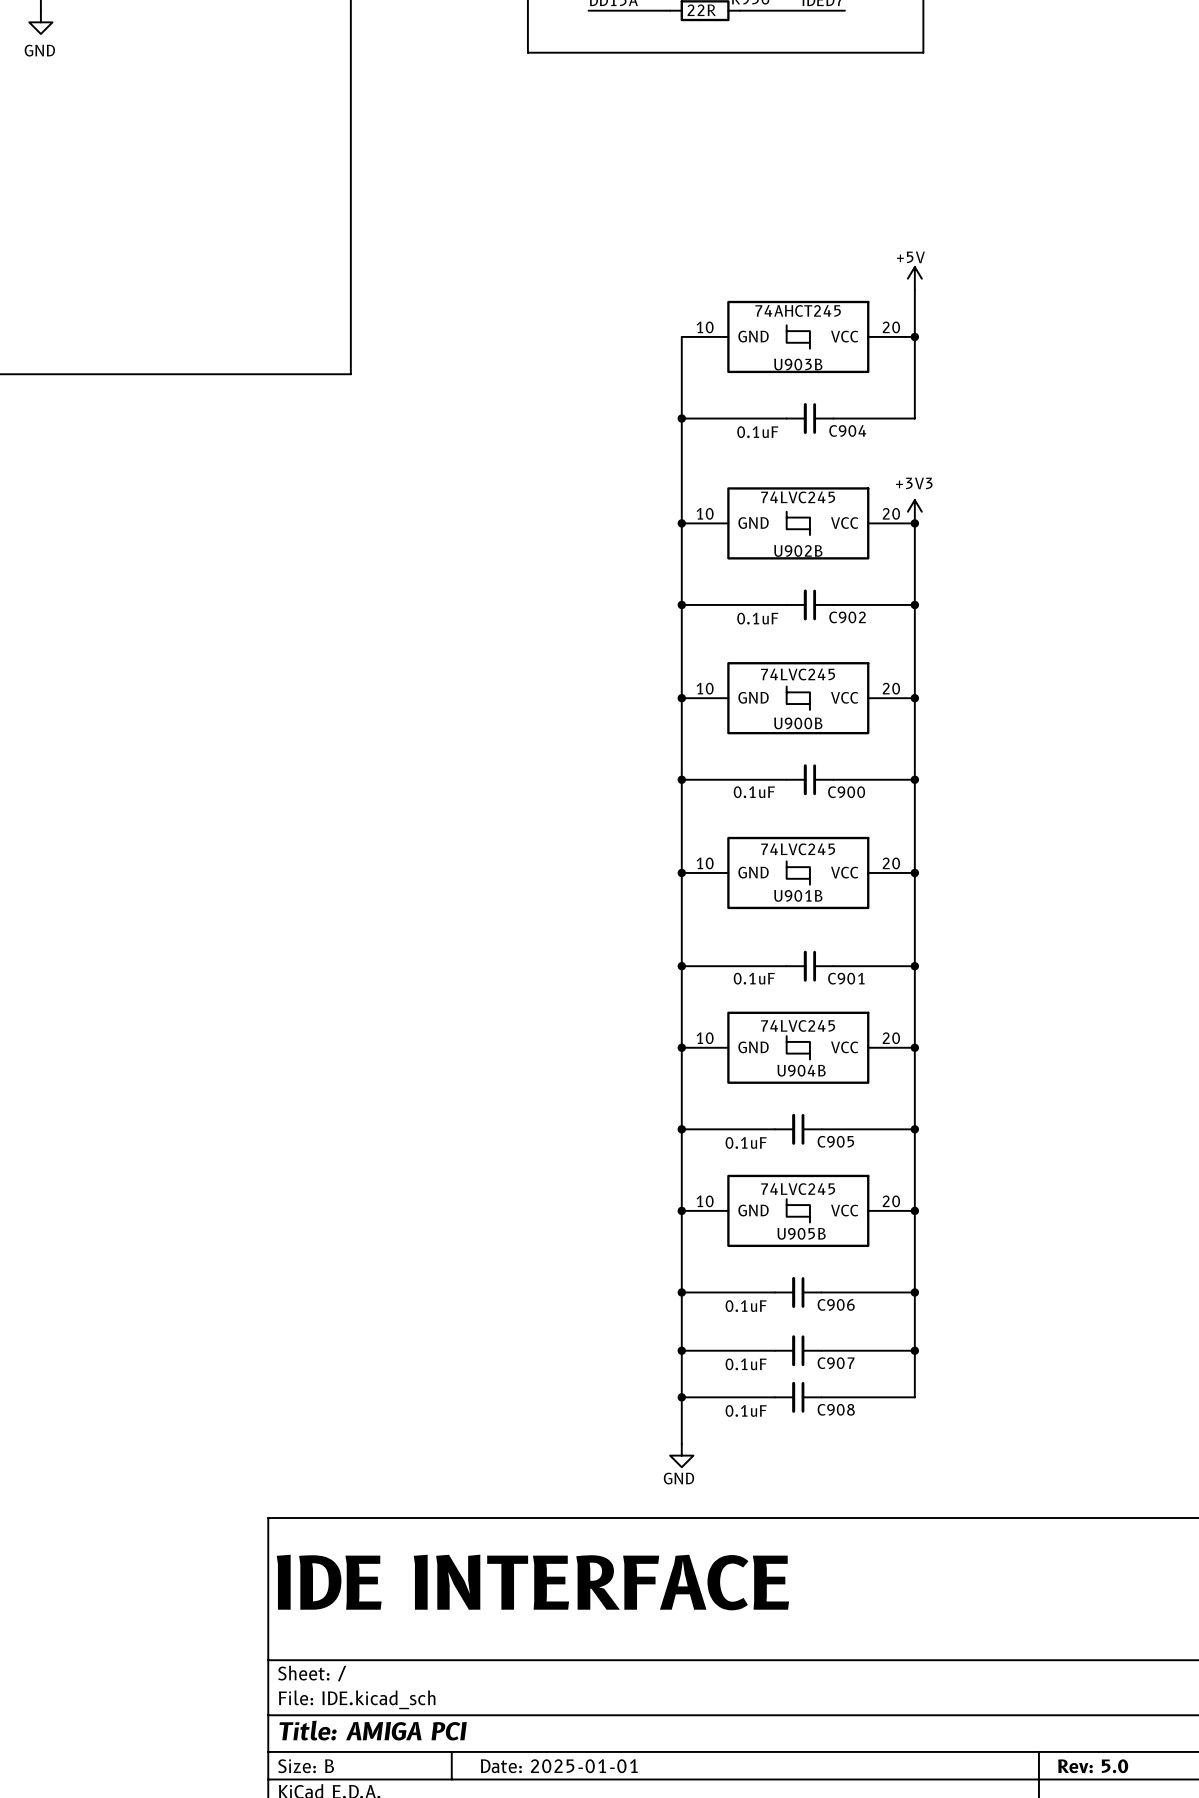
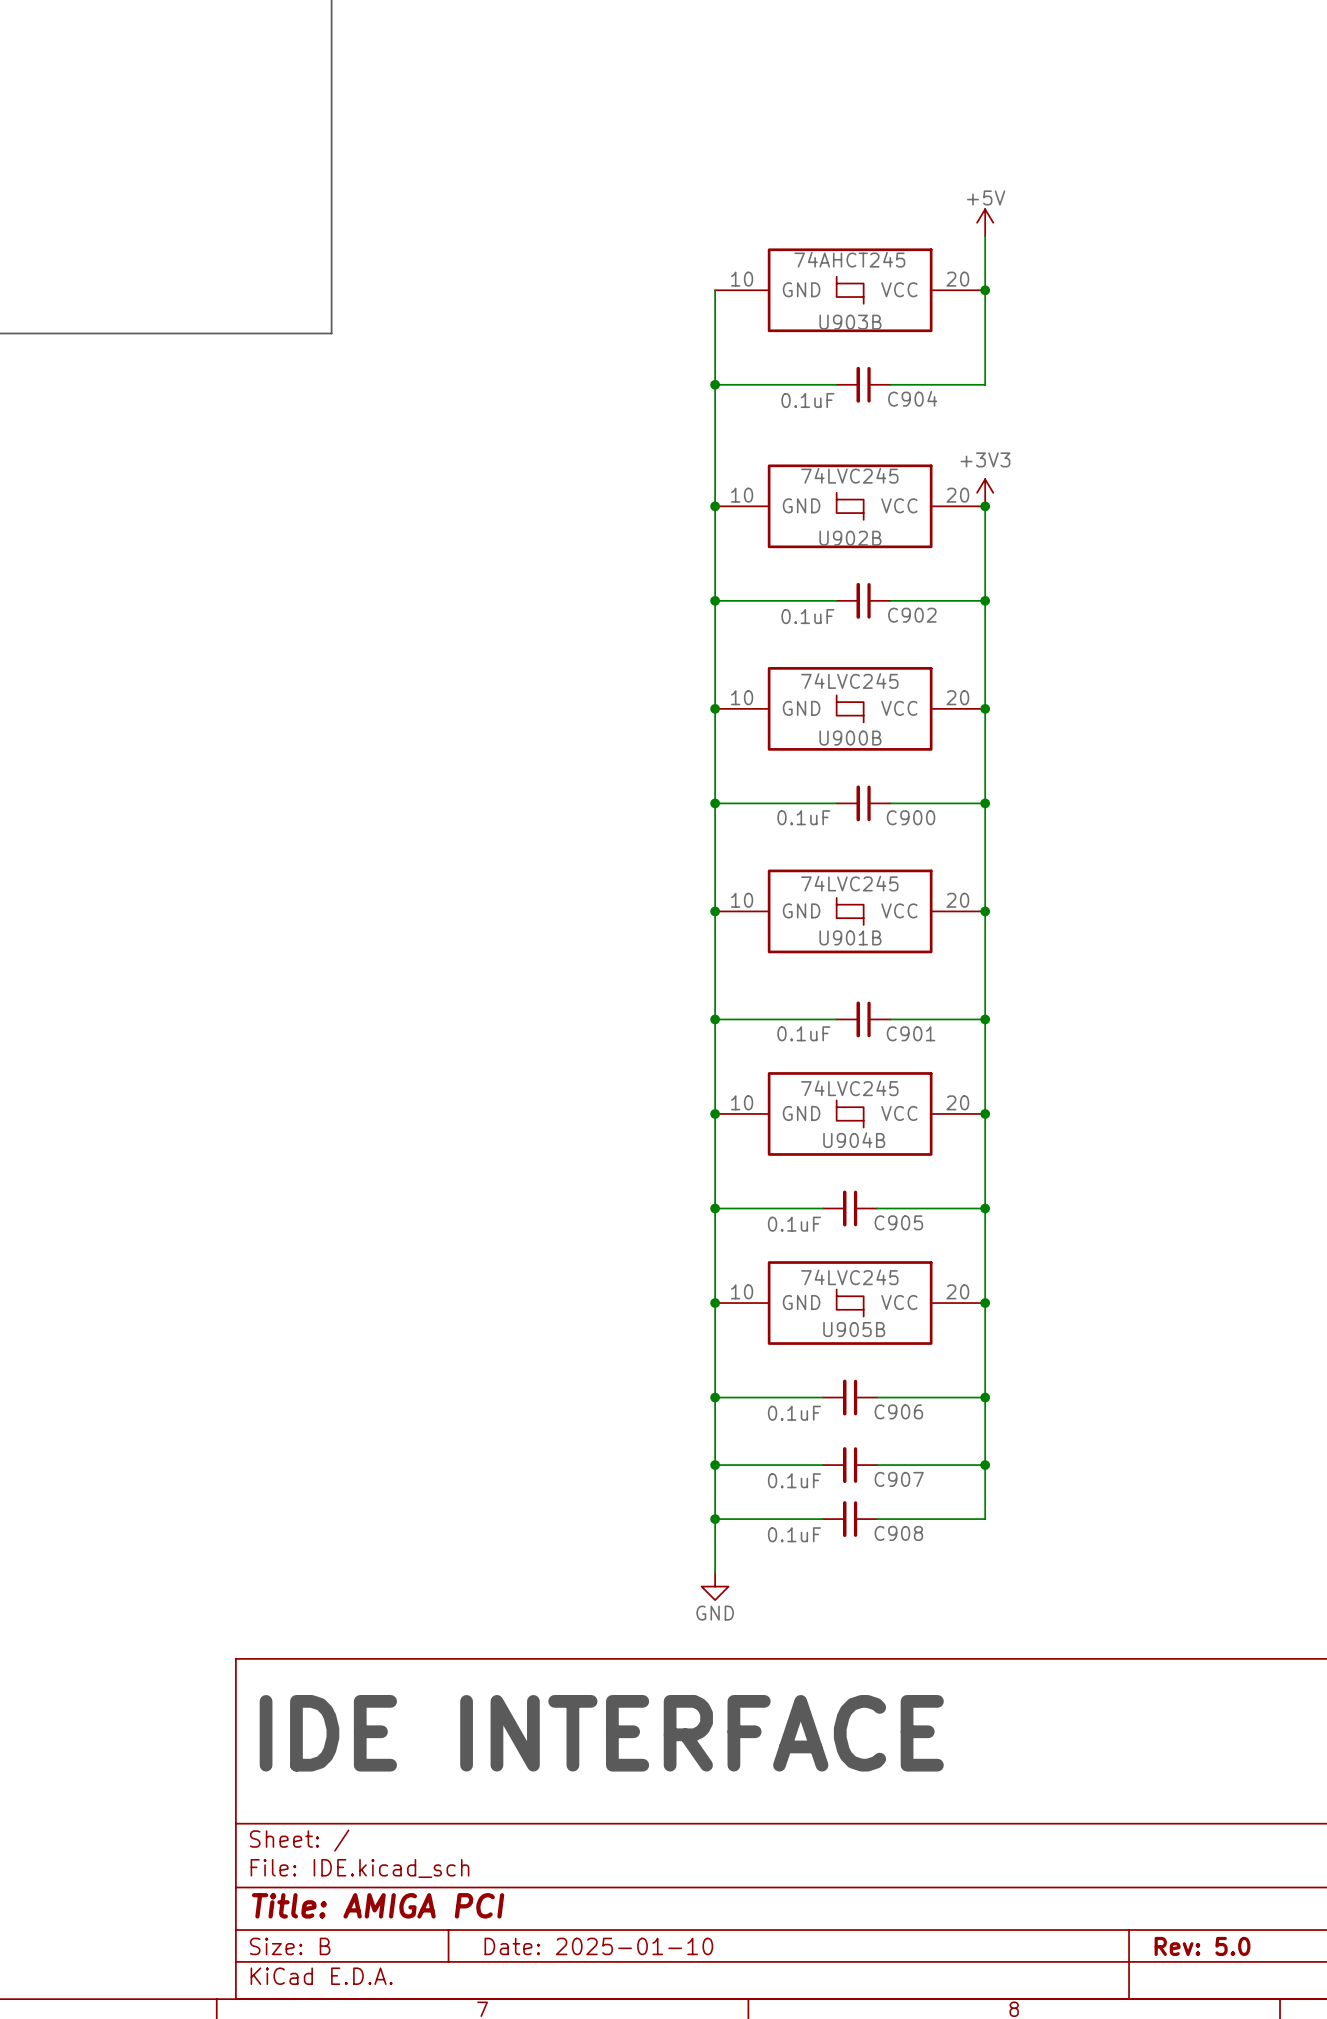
title block: Date: 2025-01-01 (559, 1766) -> Date: 2025-01-10 (598, 1946)

